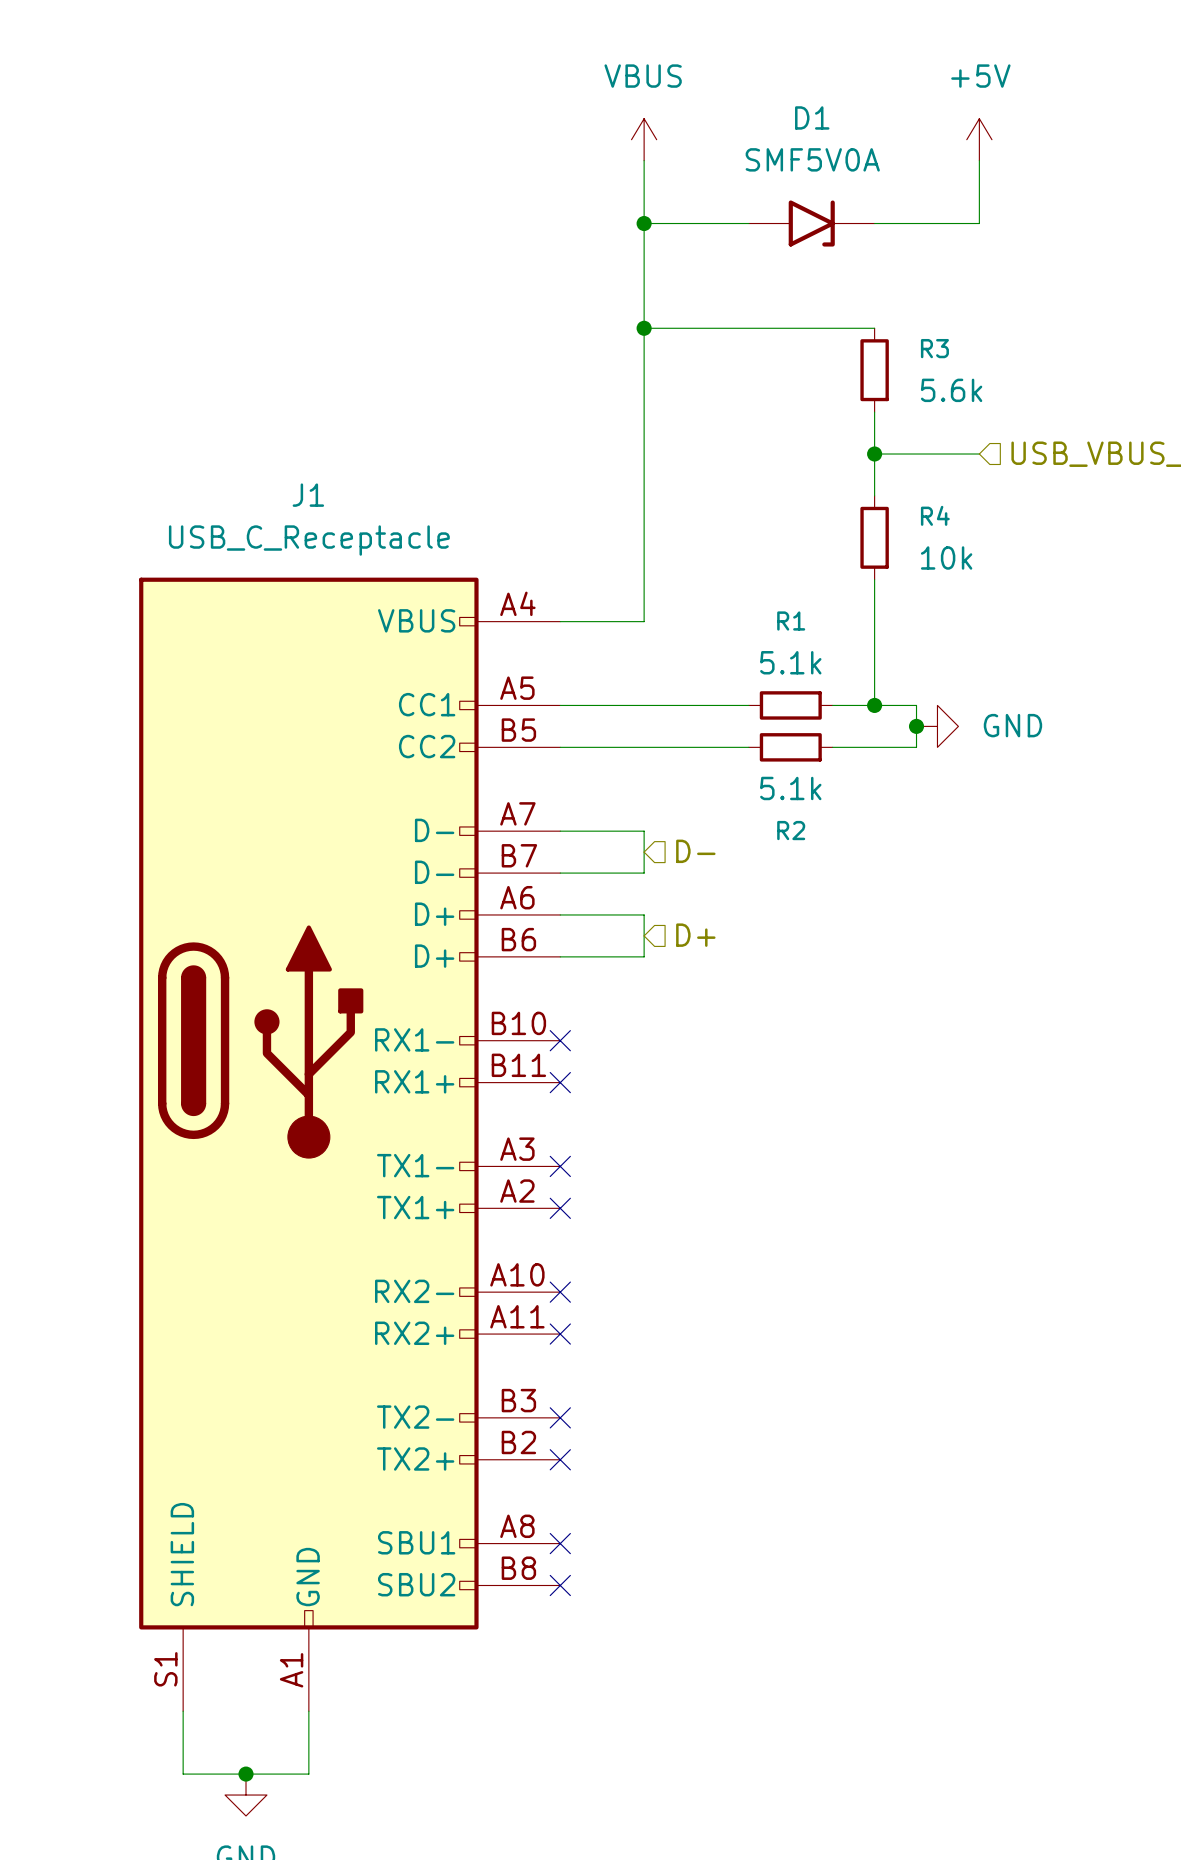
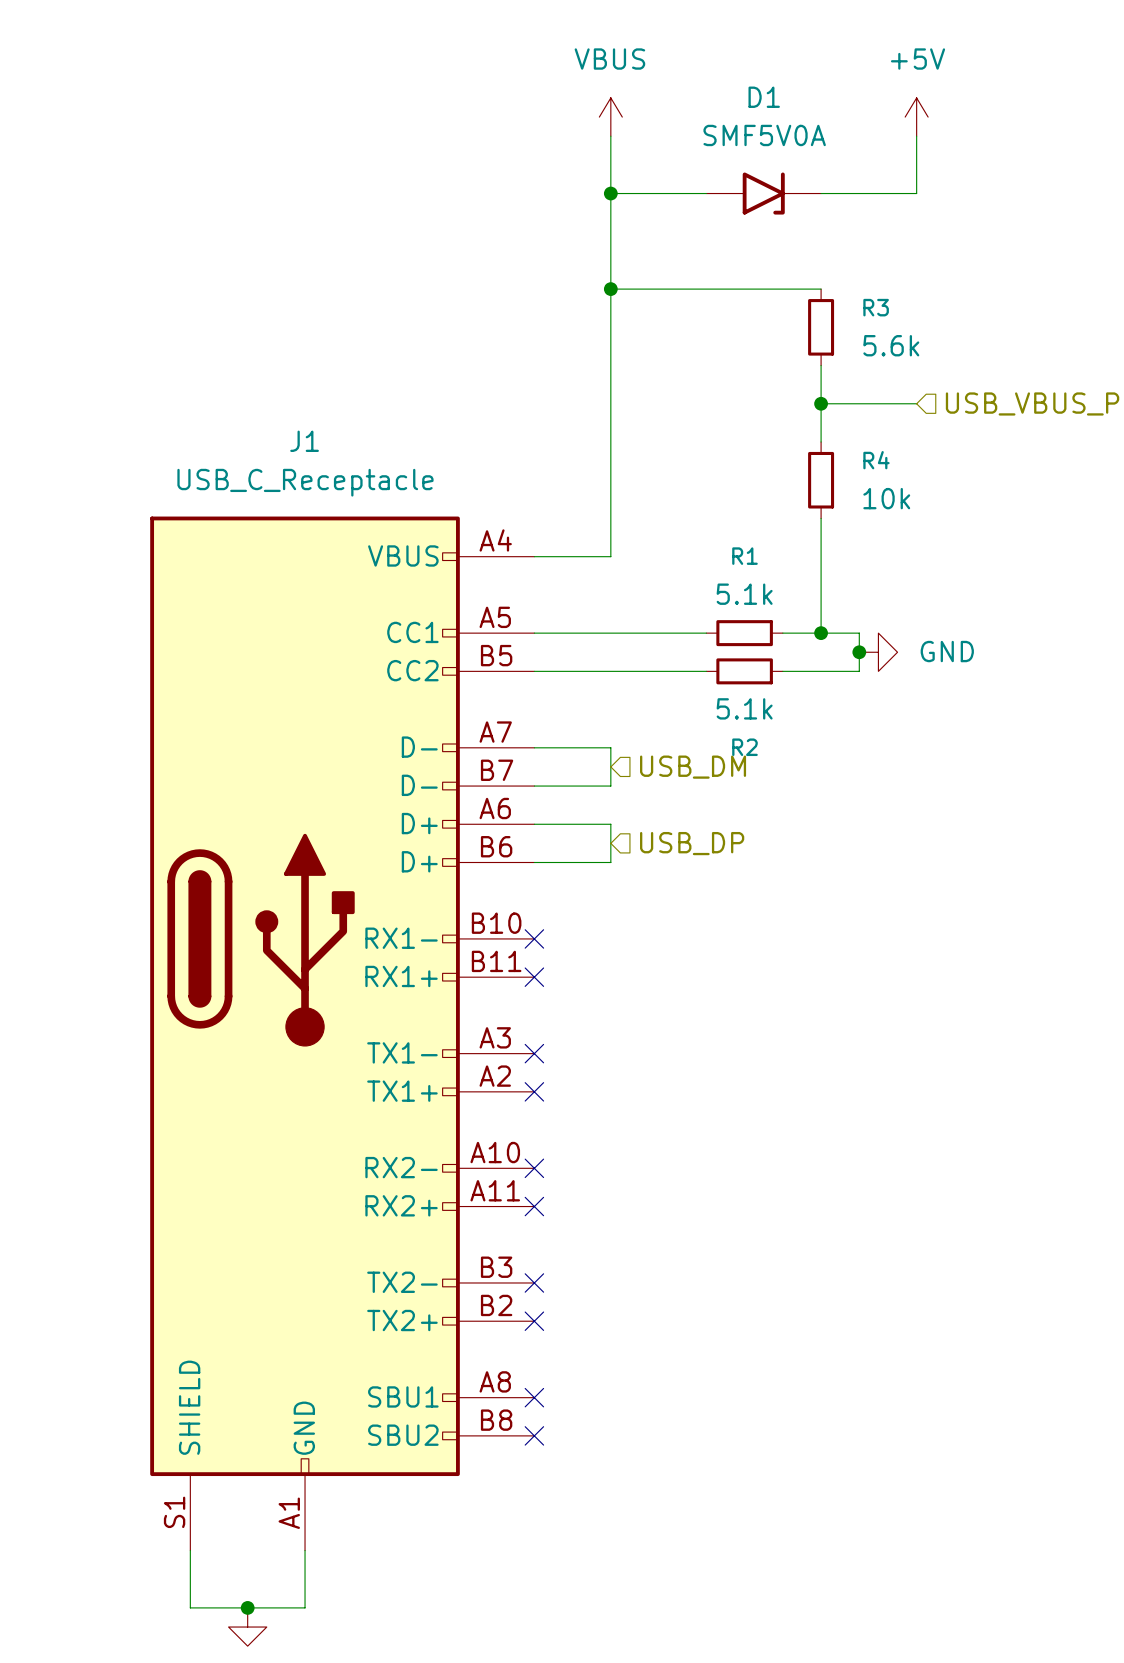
hierarchical label: D- (695, 851) -> USB_DM (693, 767)
hierarchical label: D+ (695, 935) -> USB_DP (692, 843)

